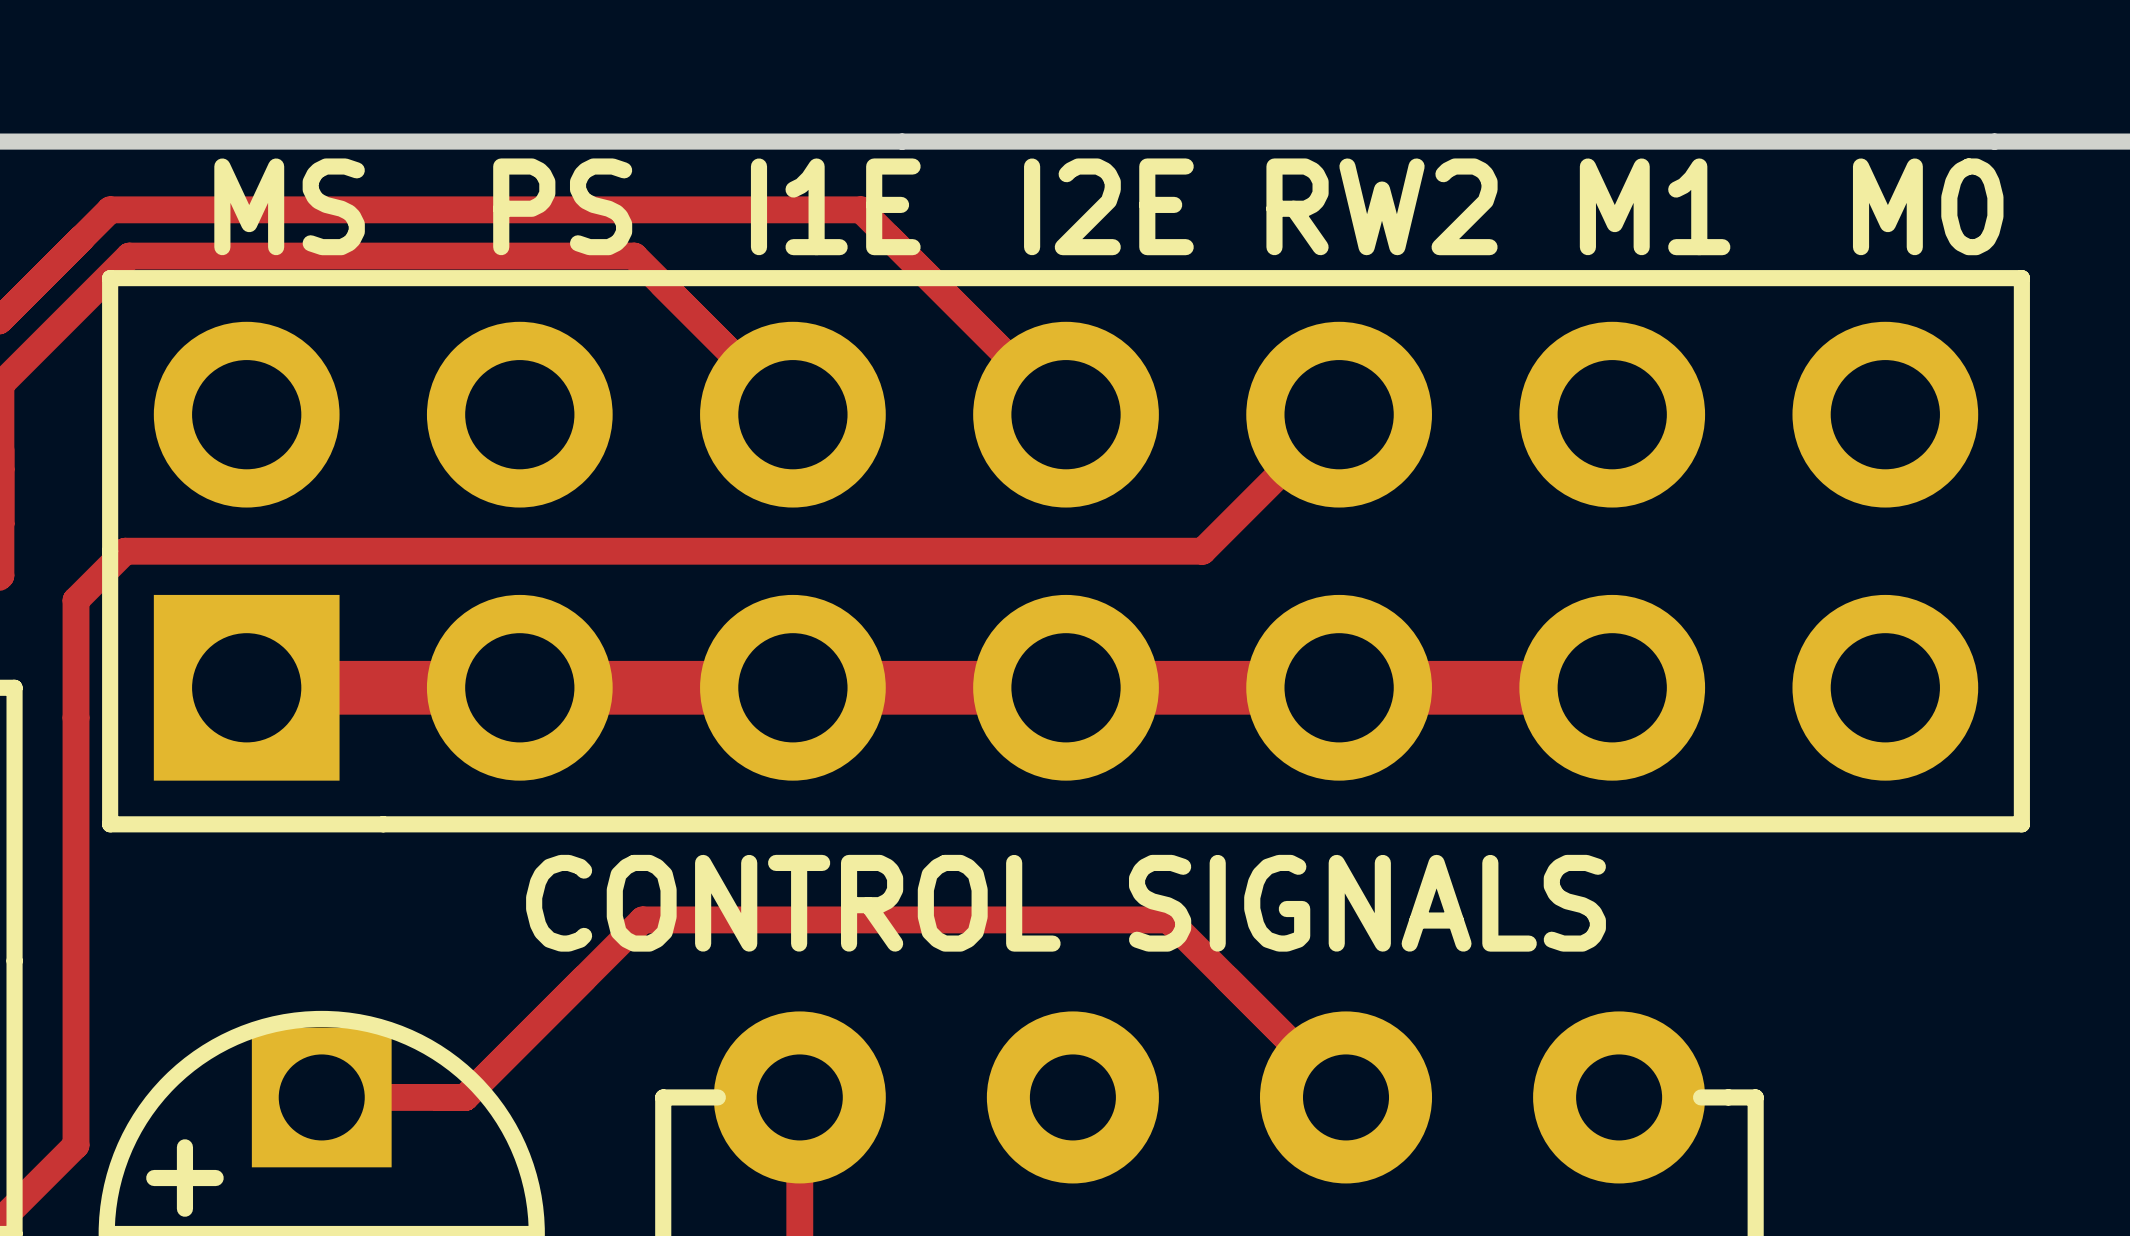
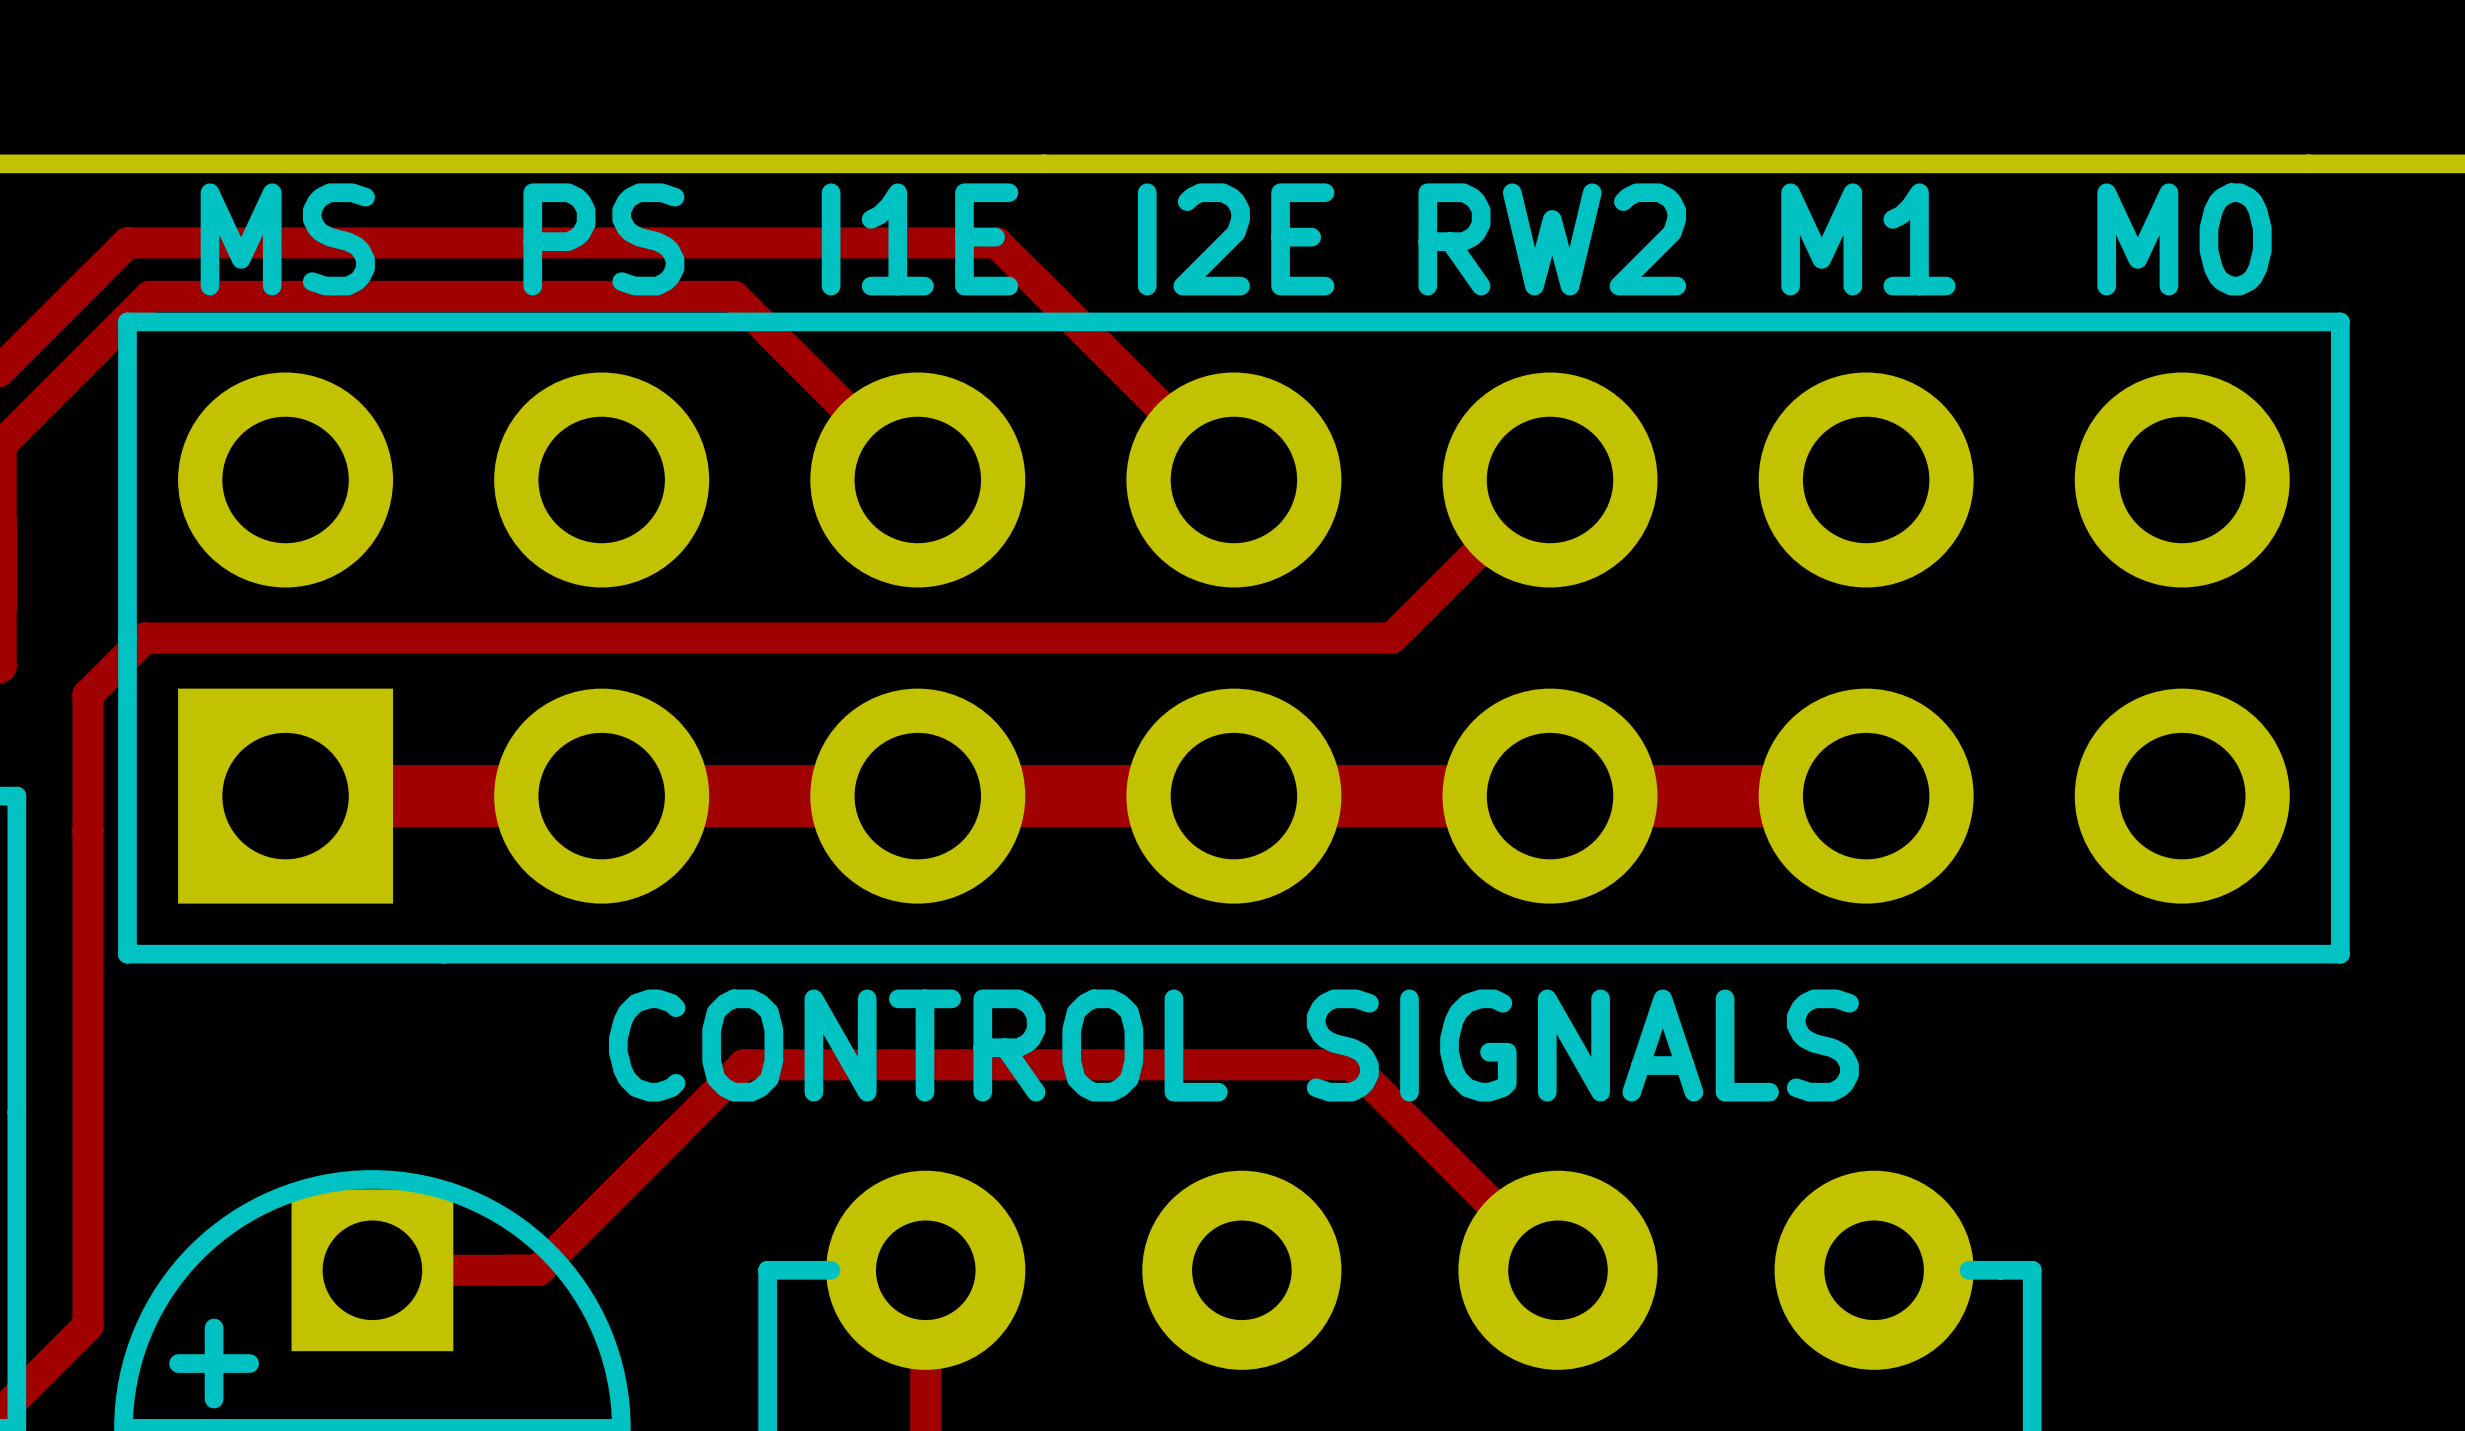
text position: MS (289, 206) -> MS (287, 239)
text position: PS (562, 206) -> PS (603, 239)
text position: I1E (835, 206) -> I1E (920, 239)
text position: I2E (1108, 206) -> I2E (1236, 239)
text position: RW2 (1382, 206) -> RW2 (1552, 239)
text position: M1 (1655, 206) -> M1 (1868, 239)
text position: M0 (1928, 206) -> M0 (2184, 239)

